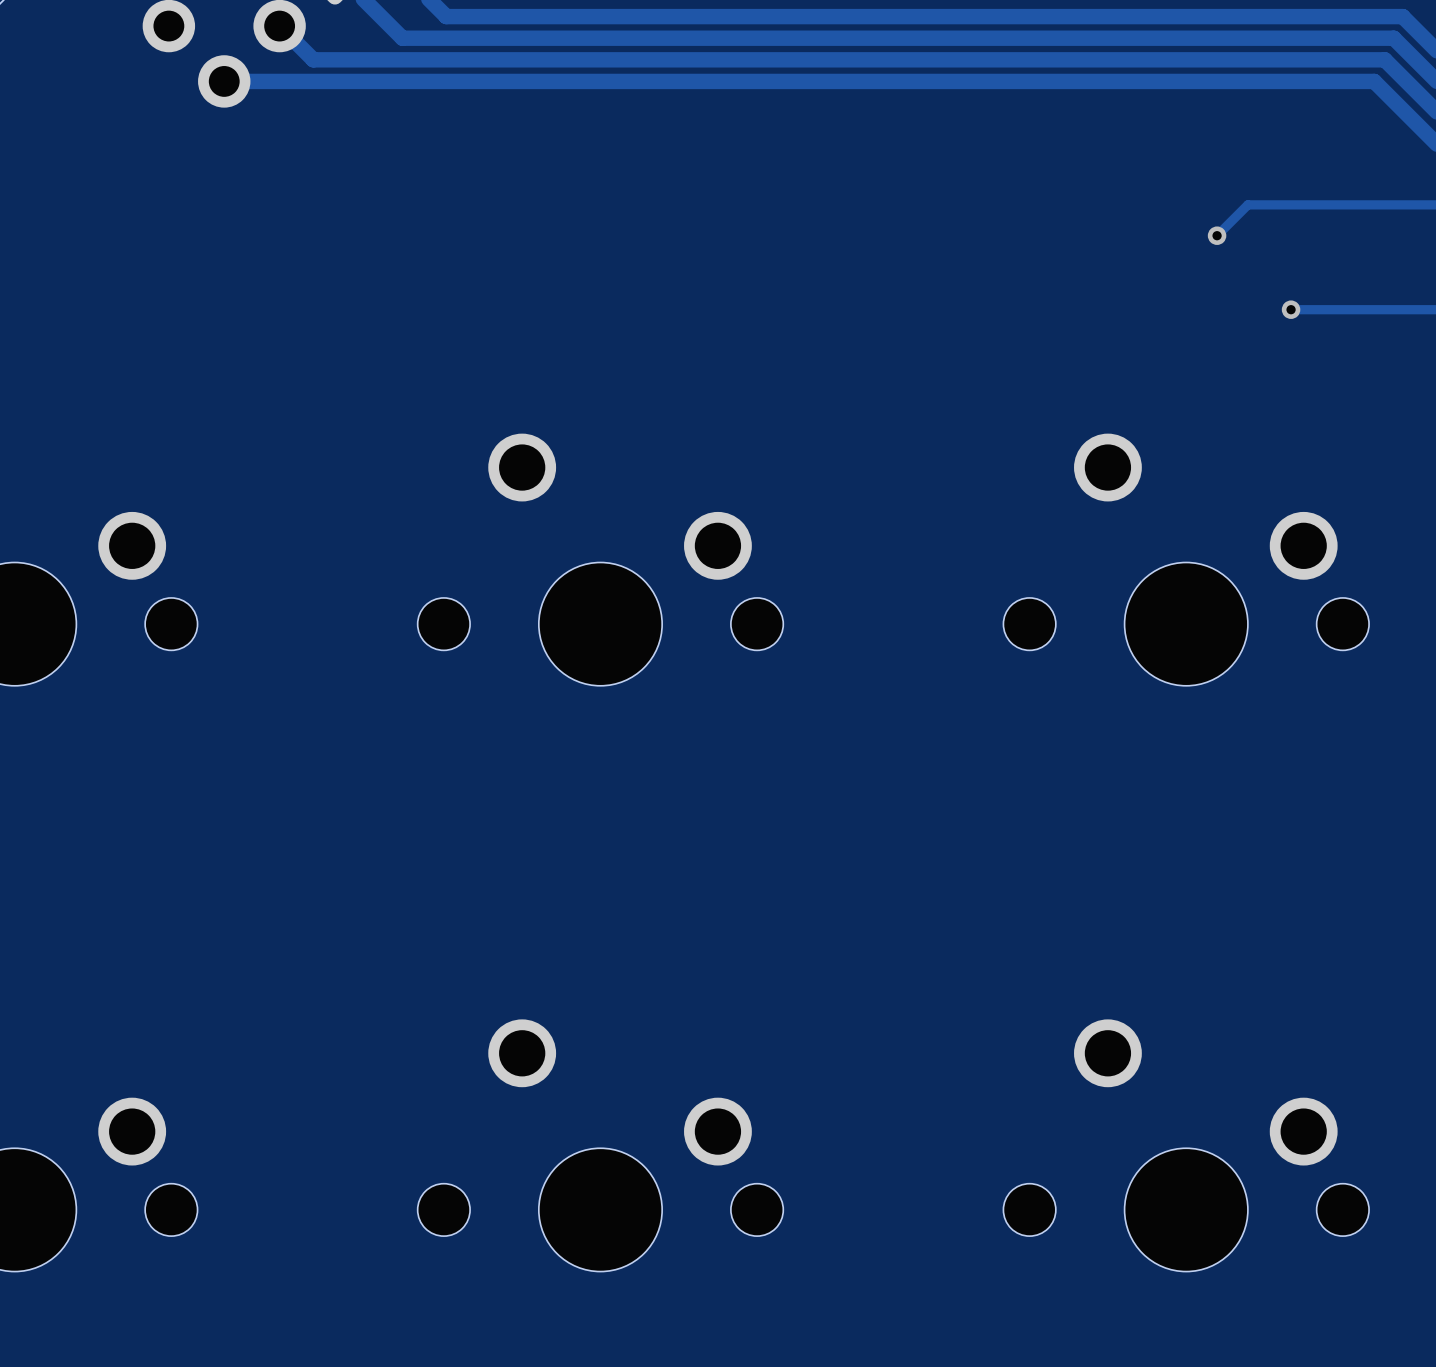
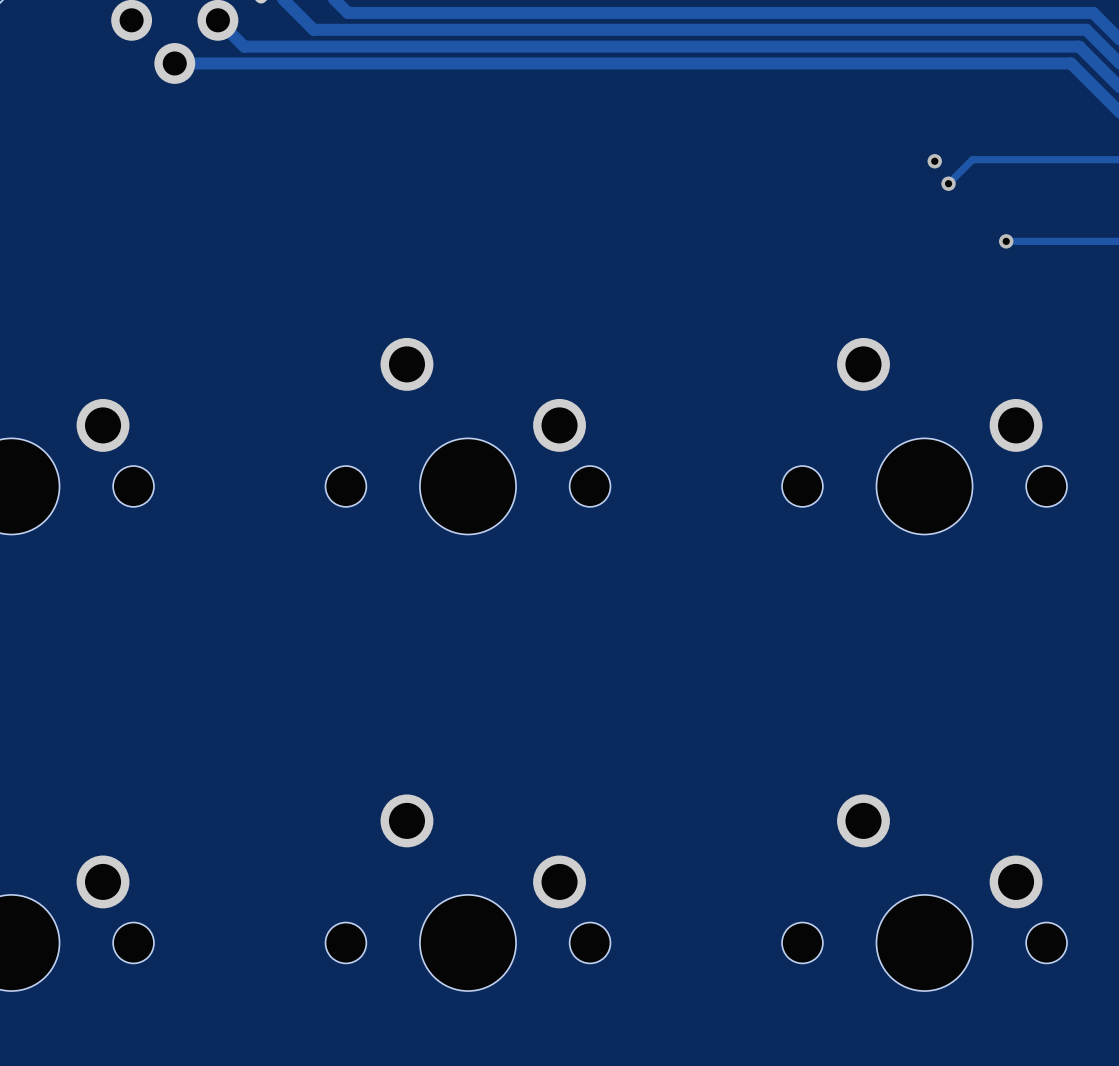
via: none -> (934, 161)

